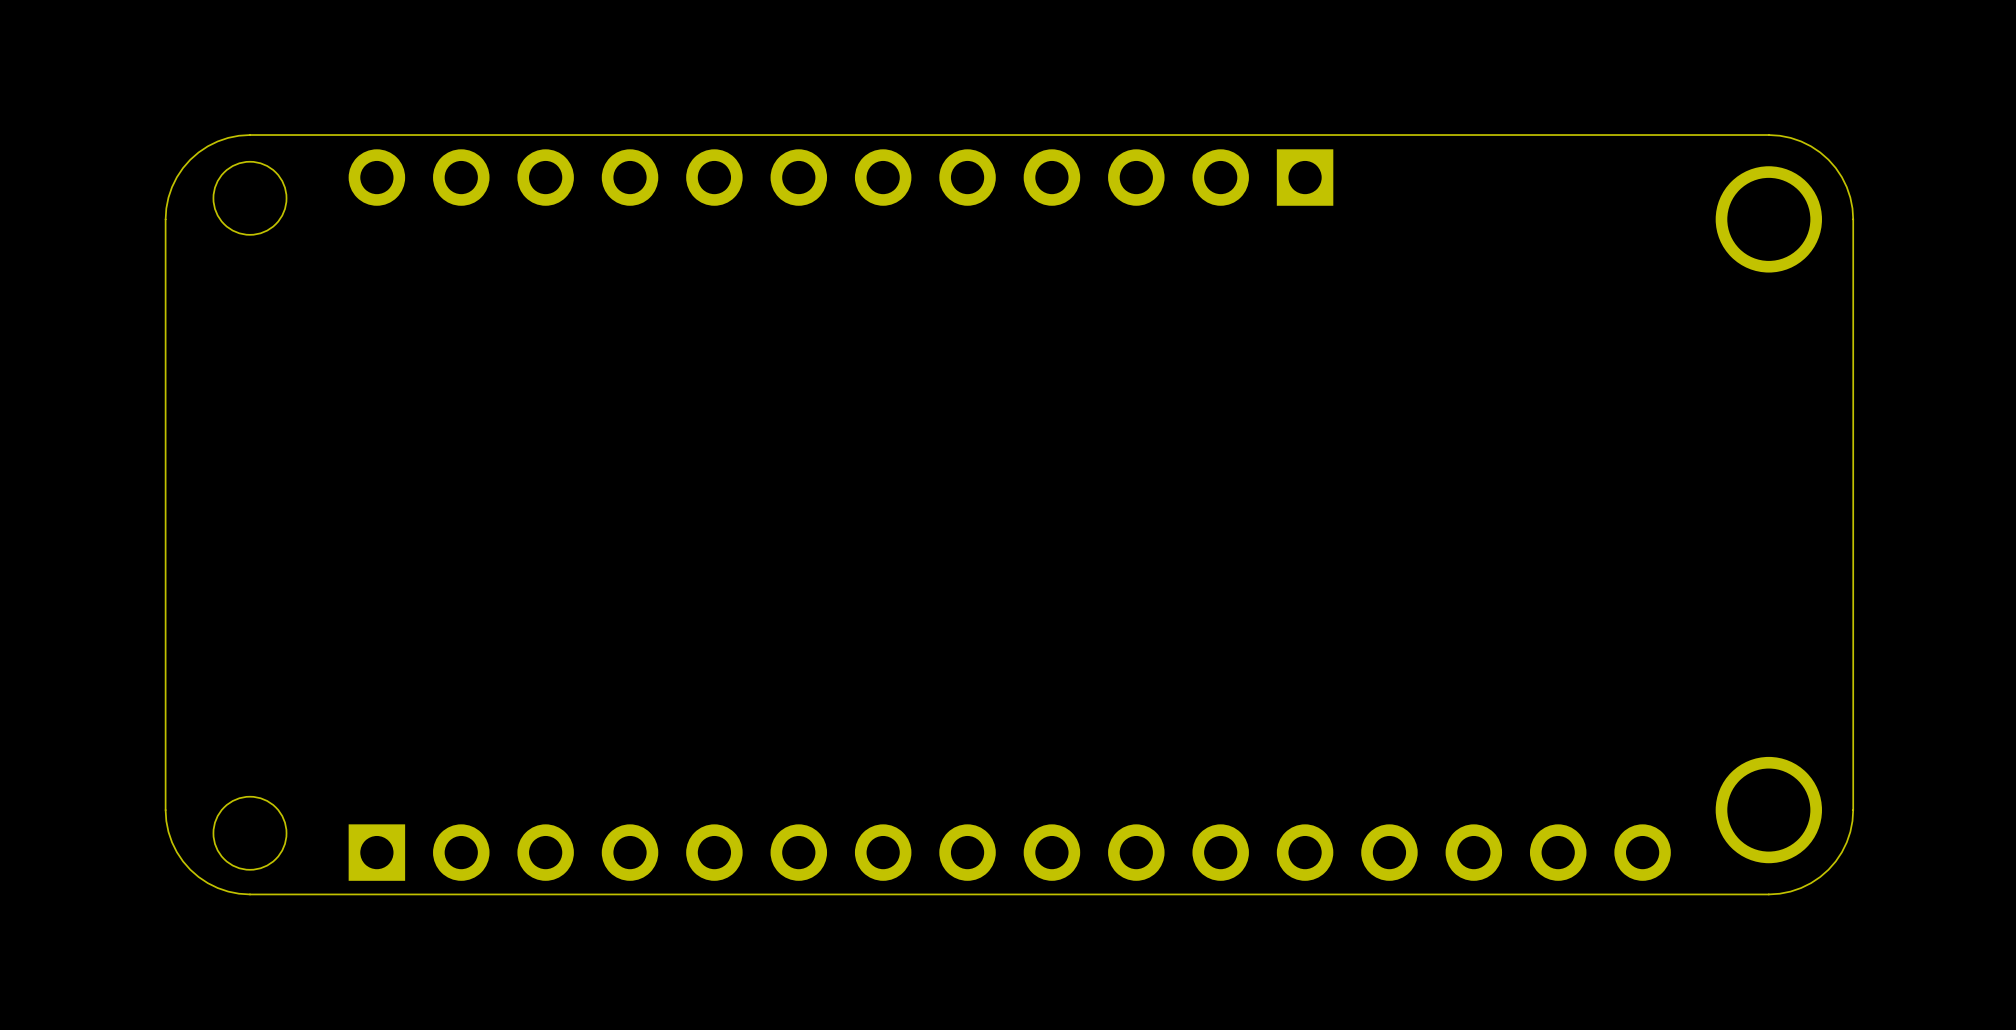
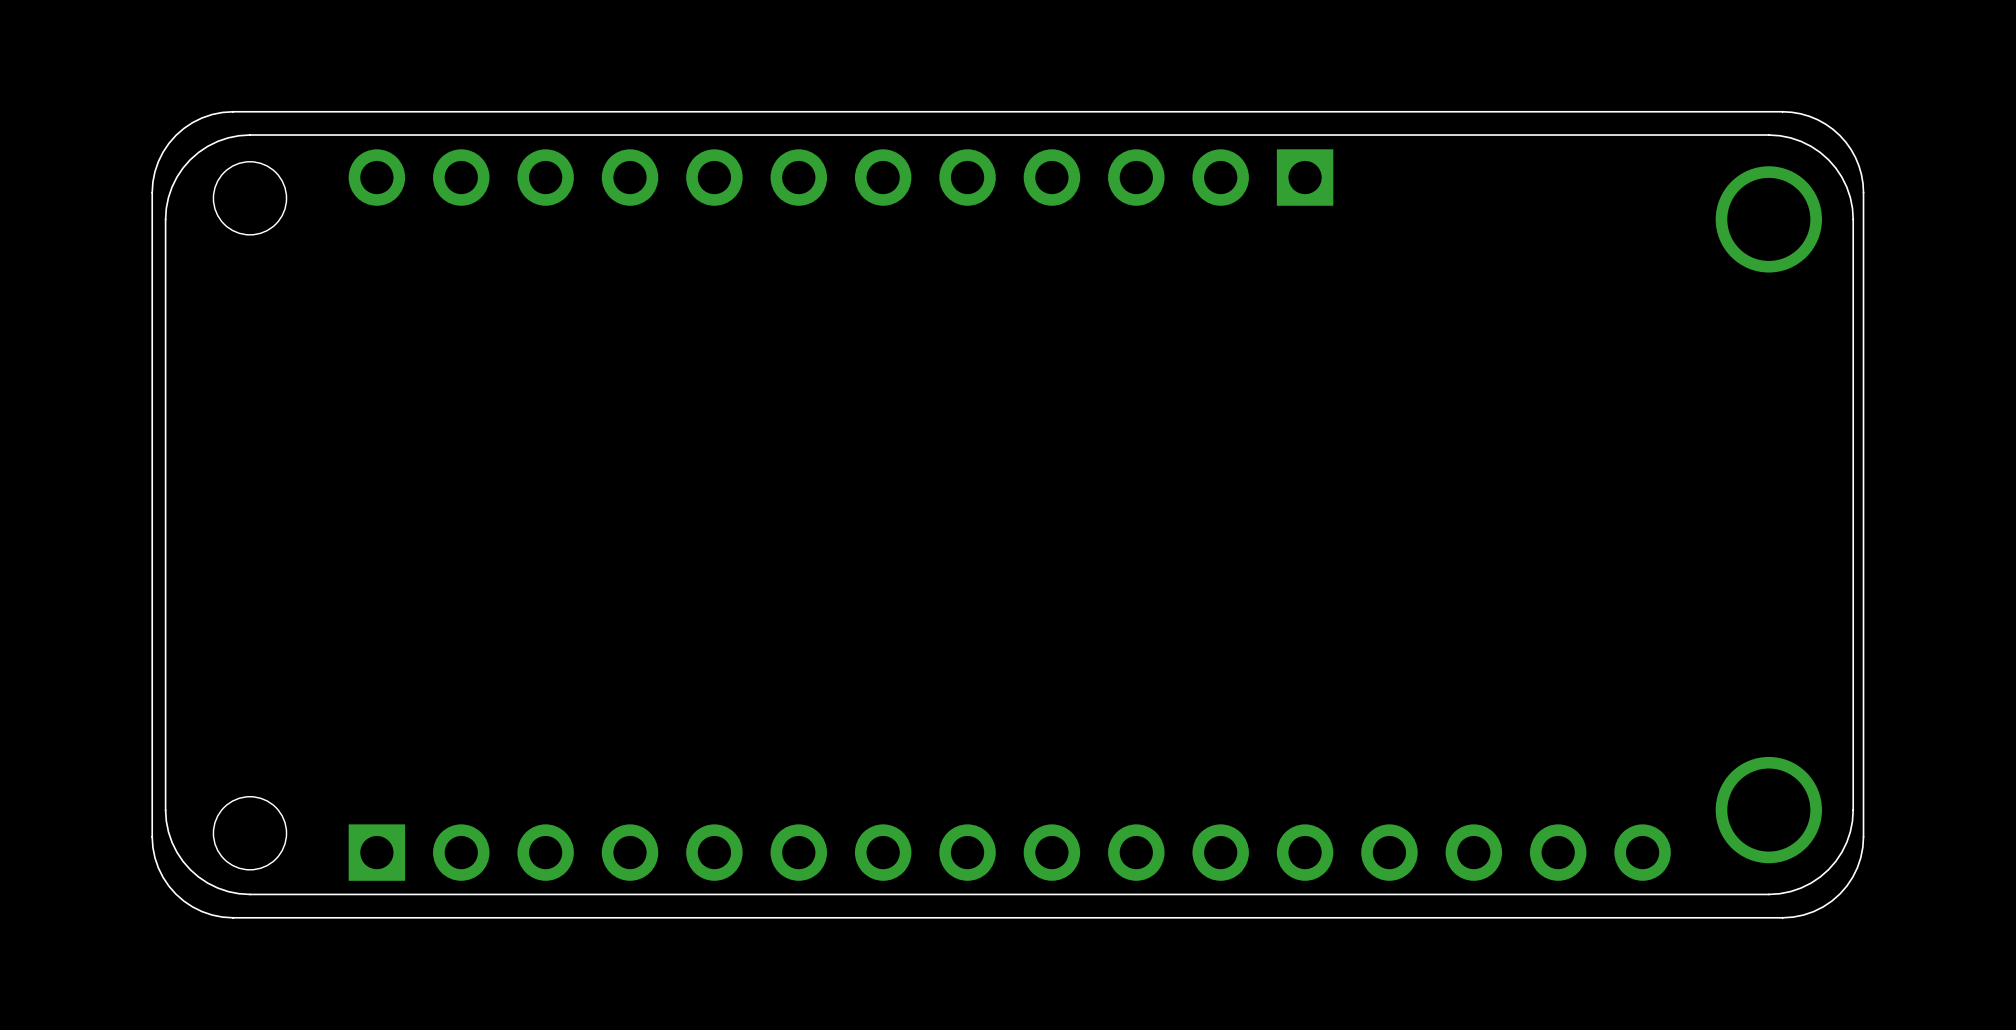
board edge: none -> (152, 192) (158, 161) (175, 135) (202, 117) (233, 111) (1782, 111) (1809, 116) (1833, 129) (1845, 142) (1855, 157) (1863, 183) (1863, 836) (1857, 867) (1846, 886) (1831, 901) (1803, 915) (1782, 917) (233, 917) (202, 911) (183, 901) (168, 886) (158, 867) (152, 847) (152, 192)

